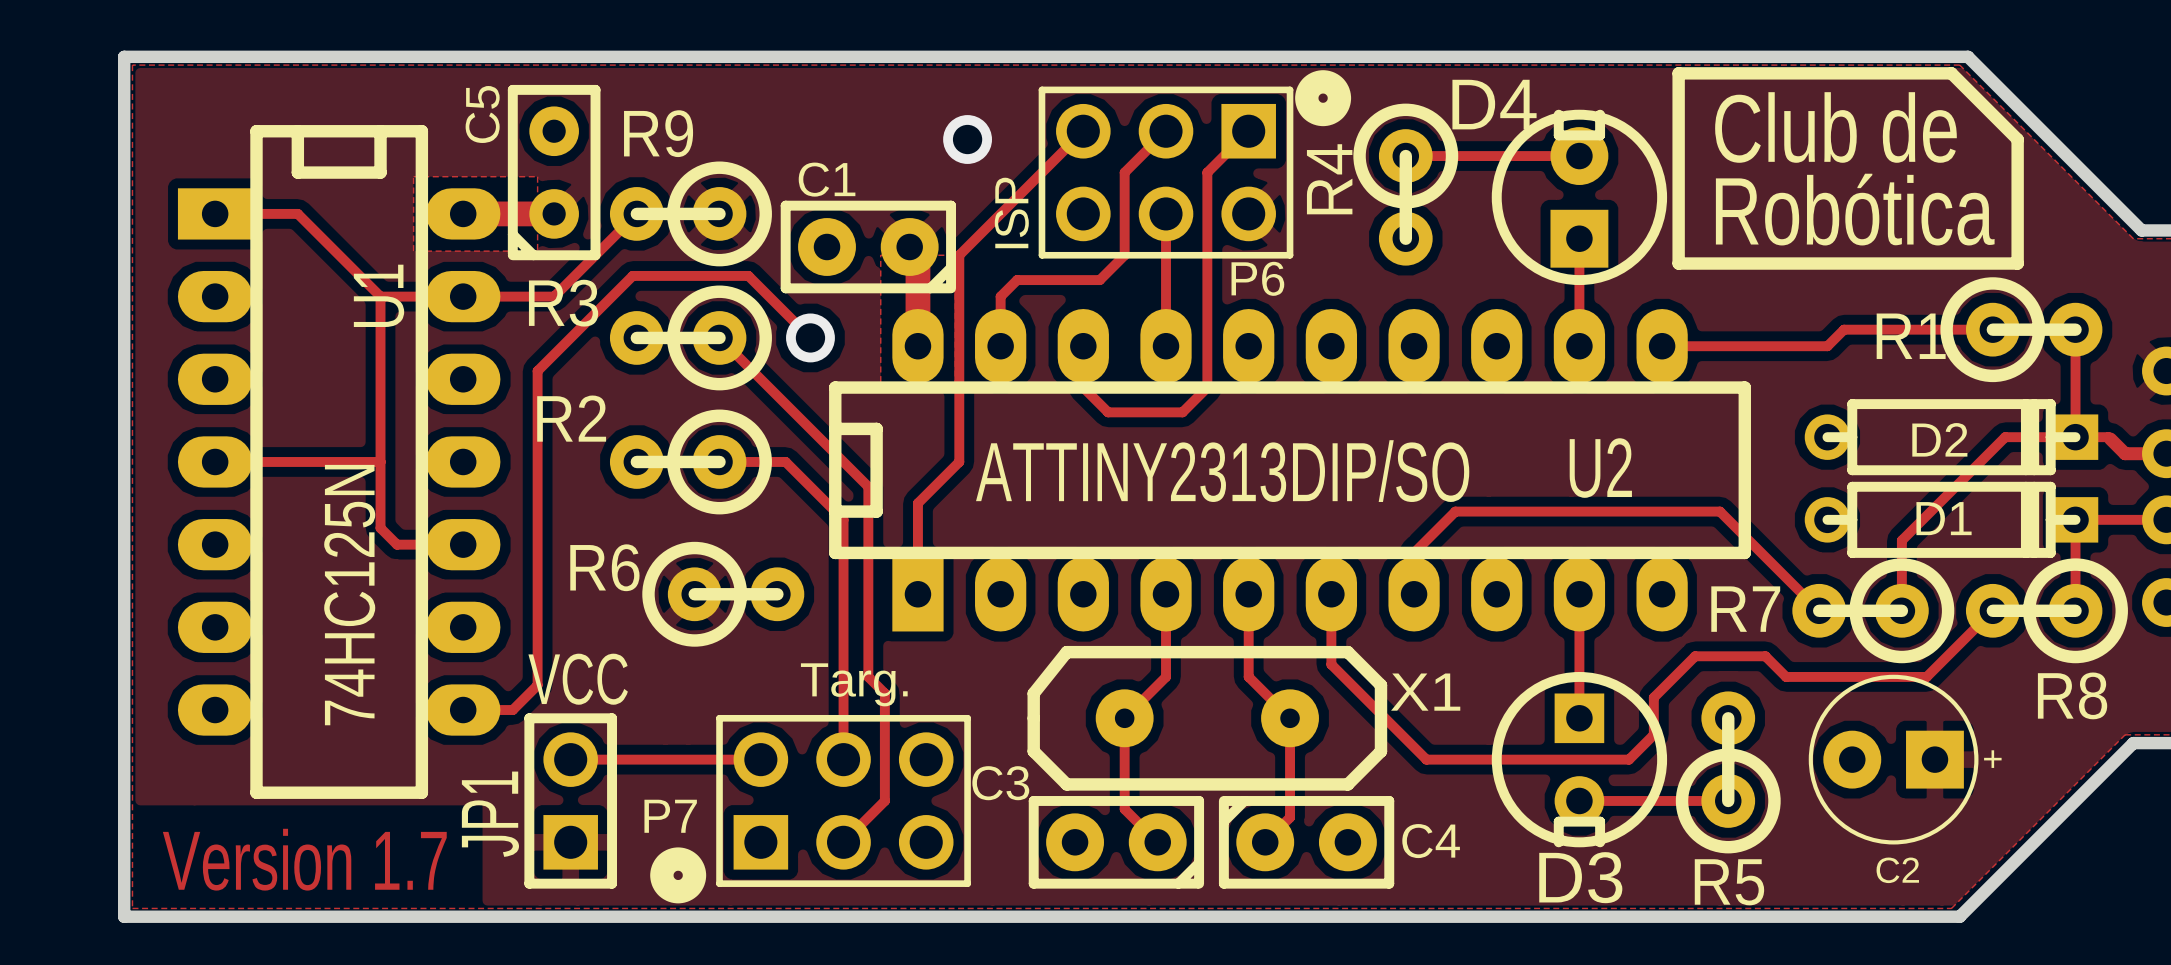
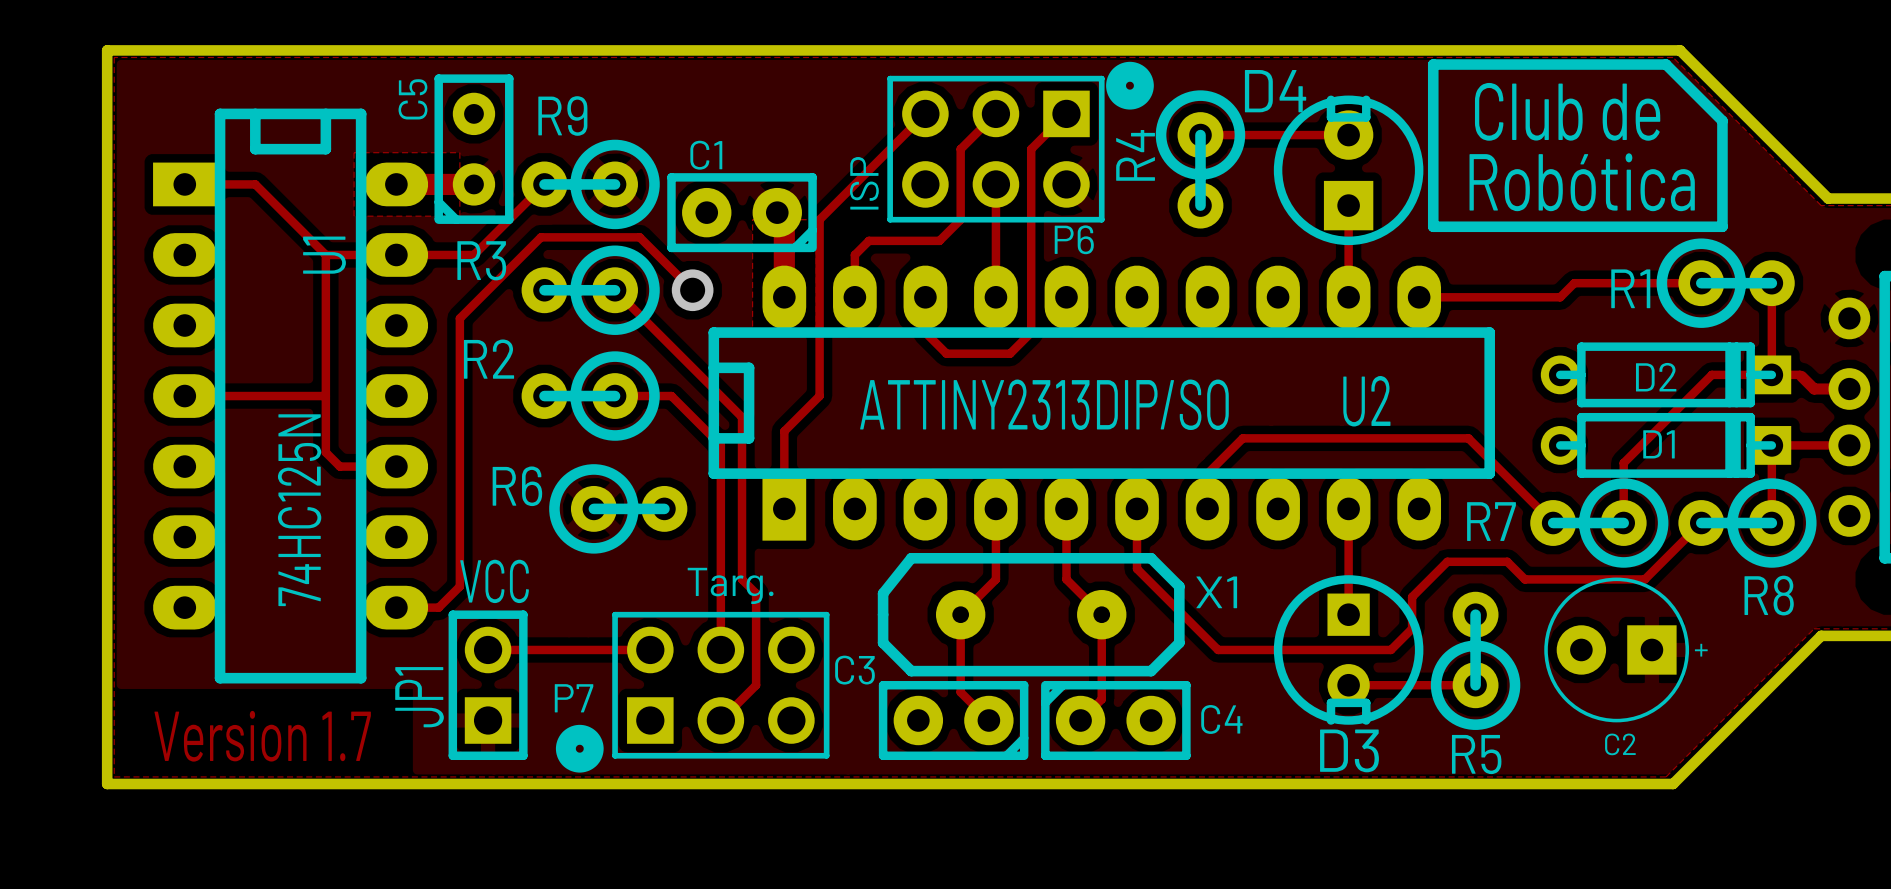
via: (967, 139) -> none

